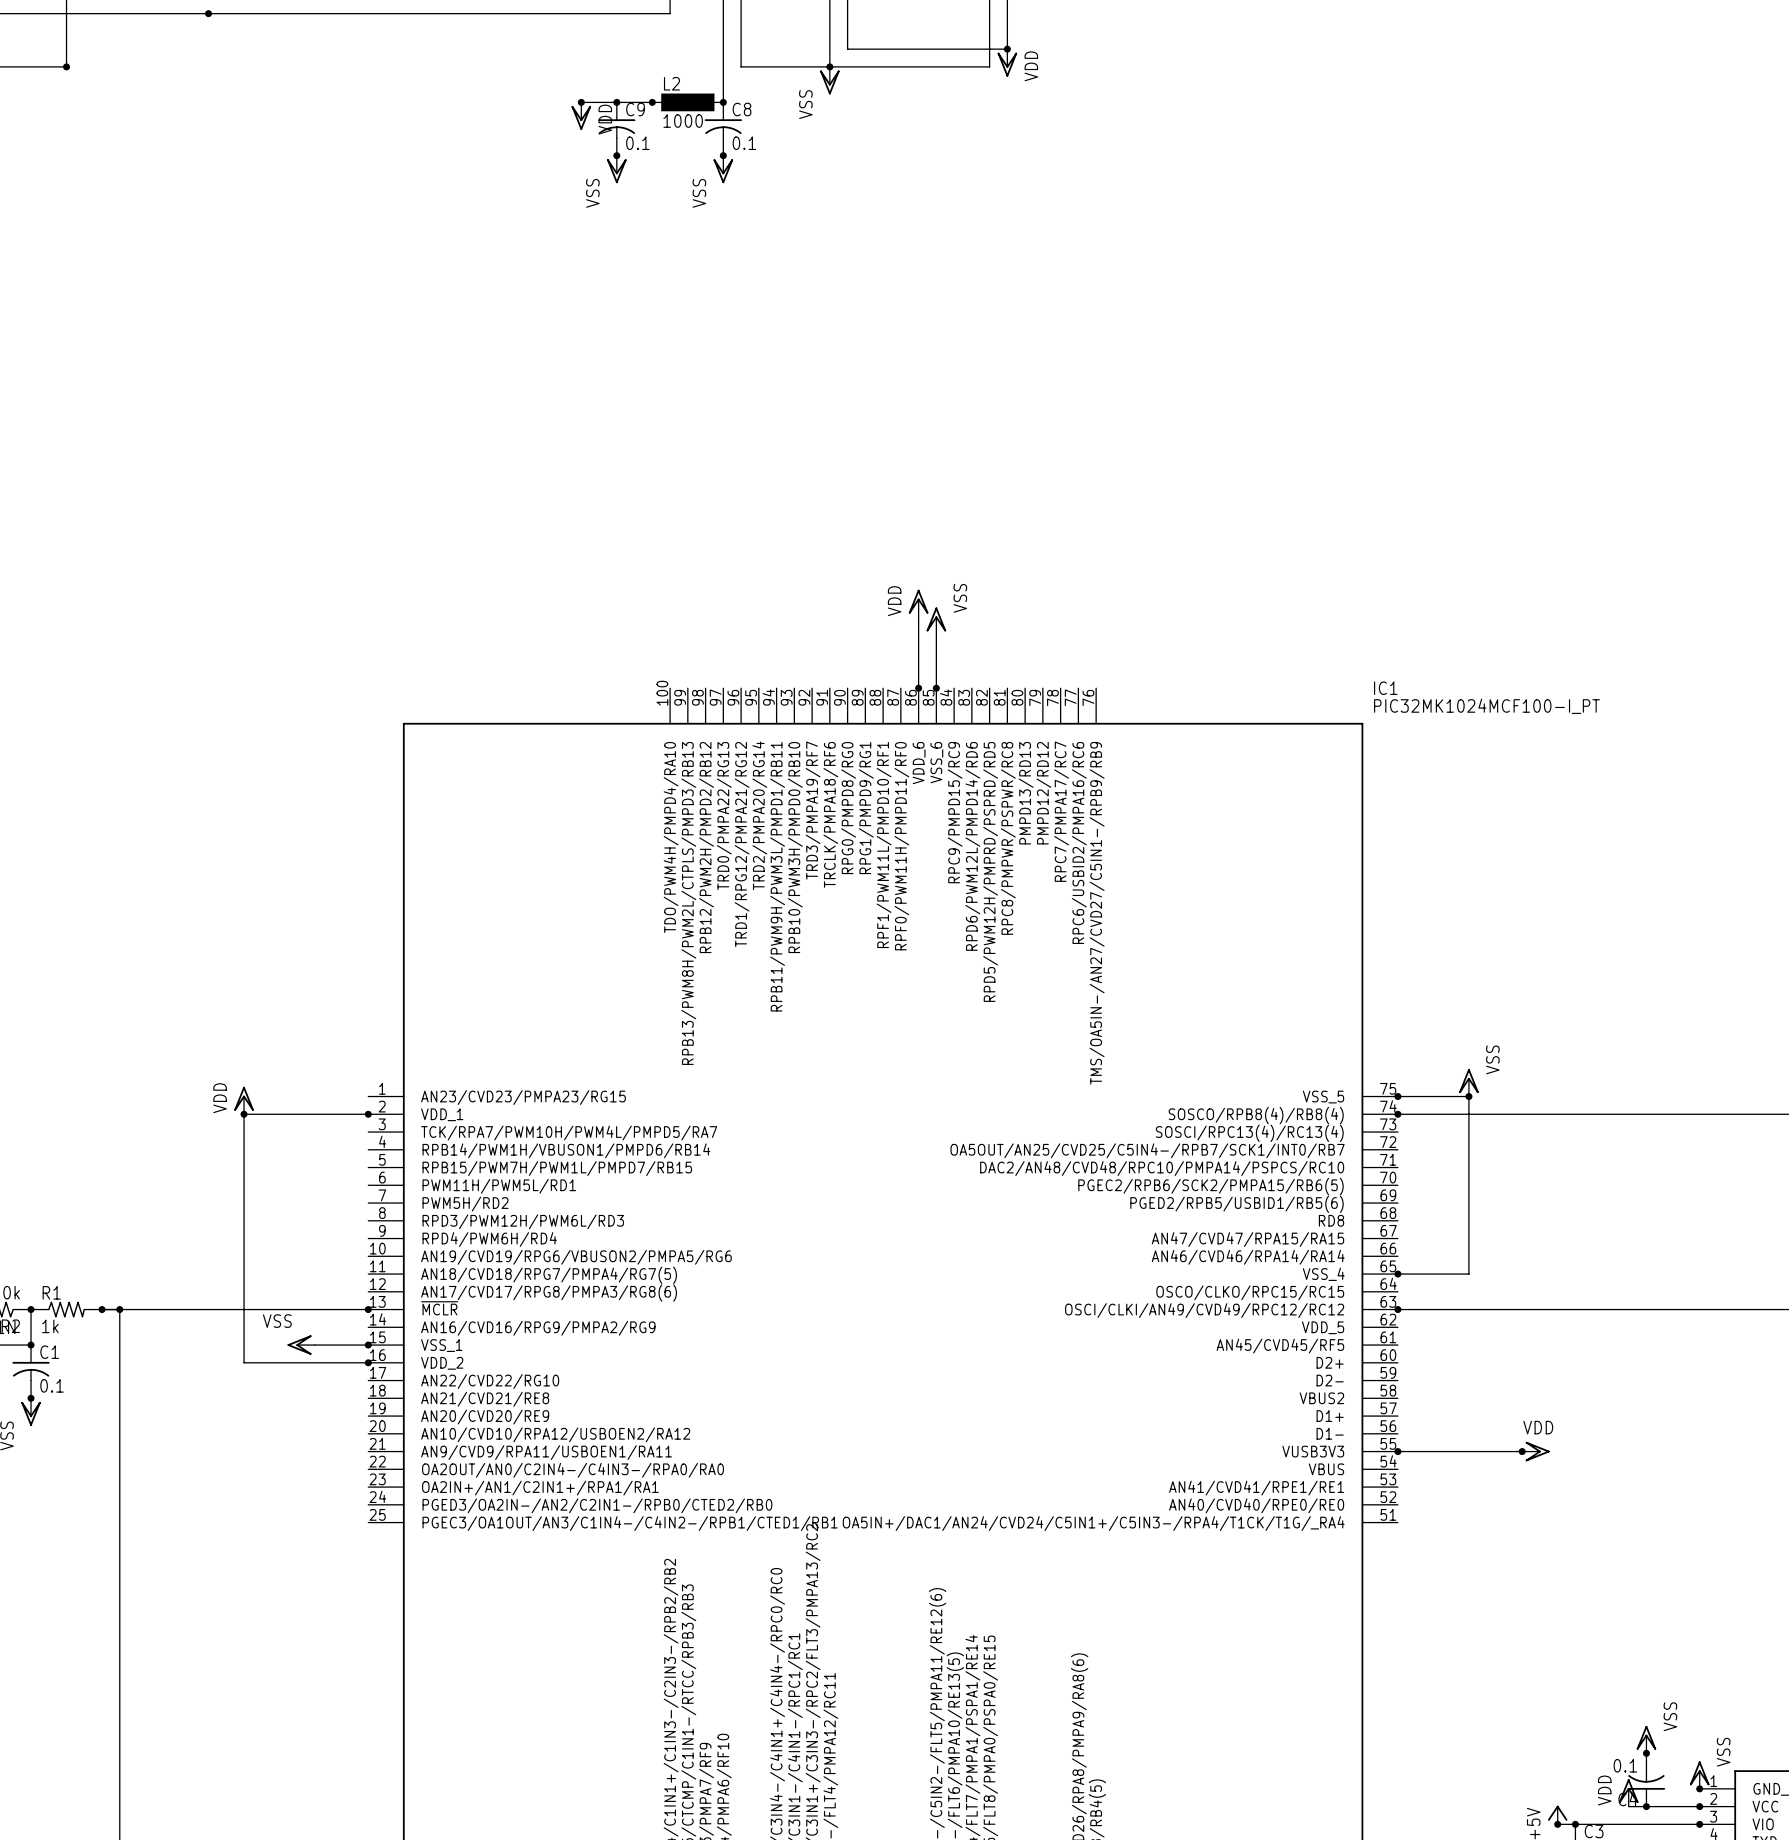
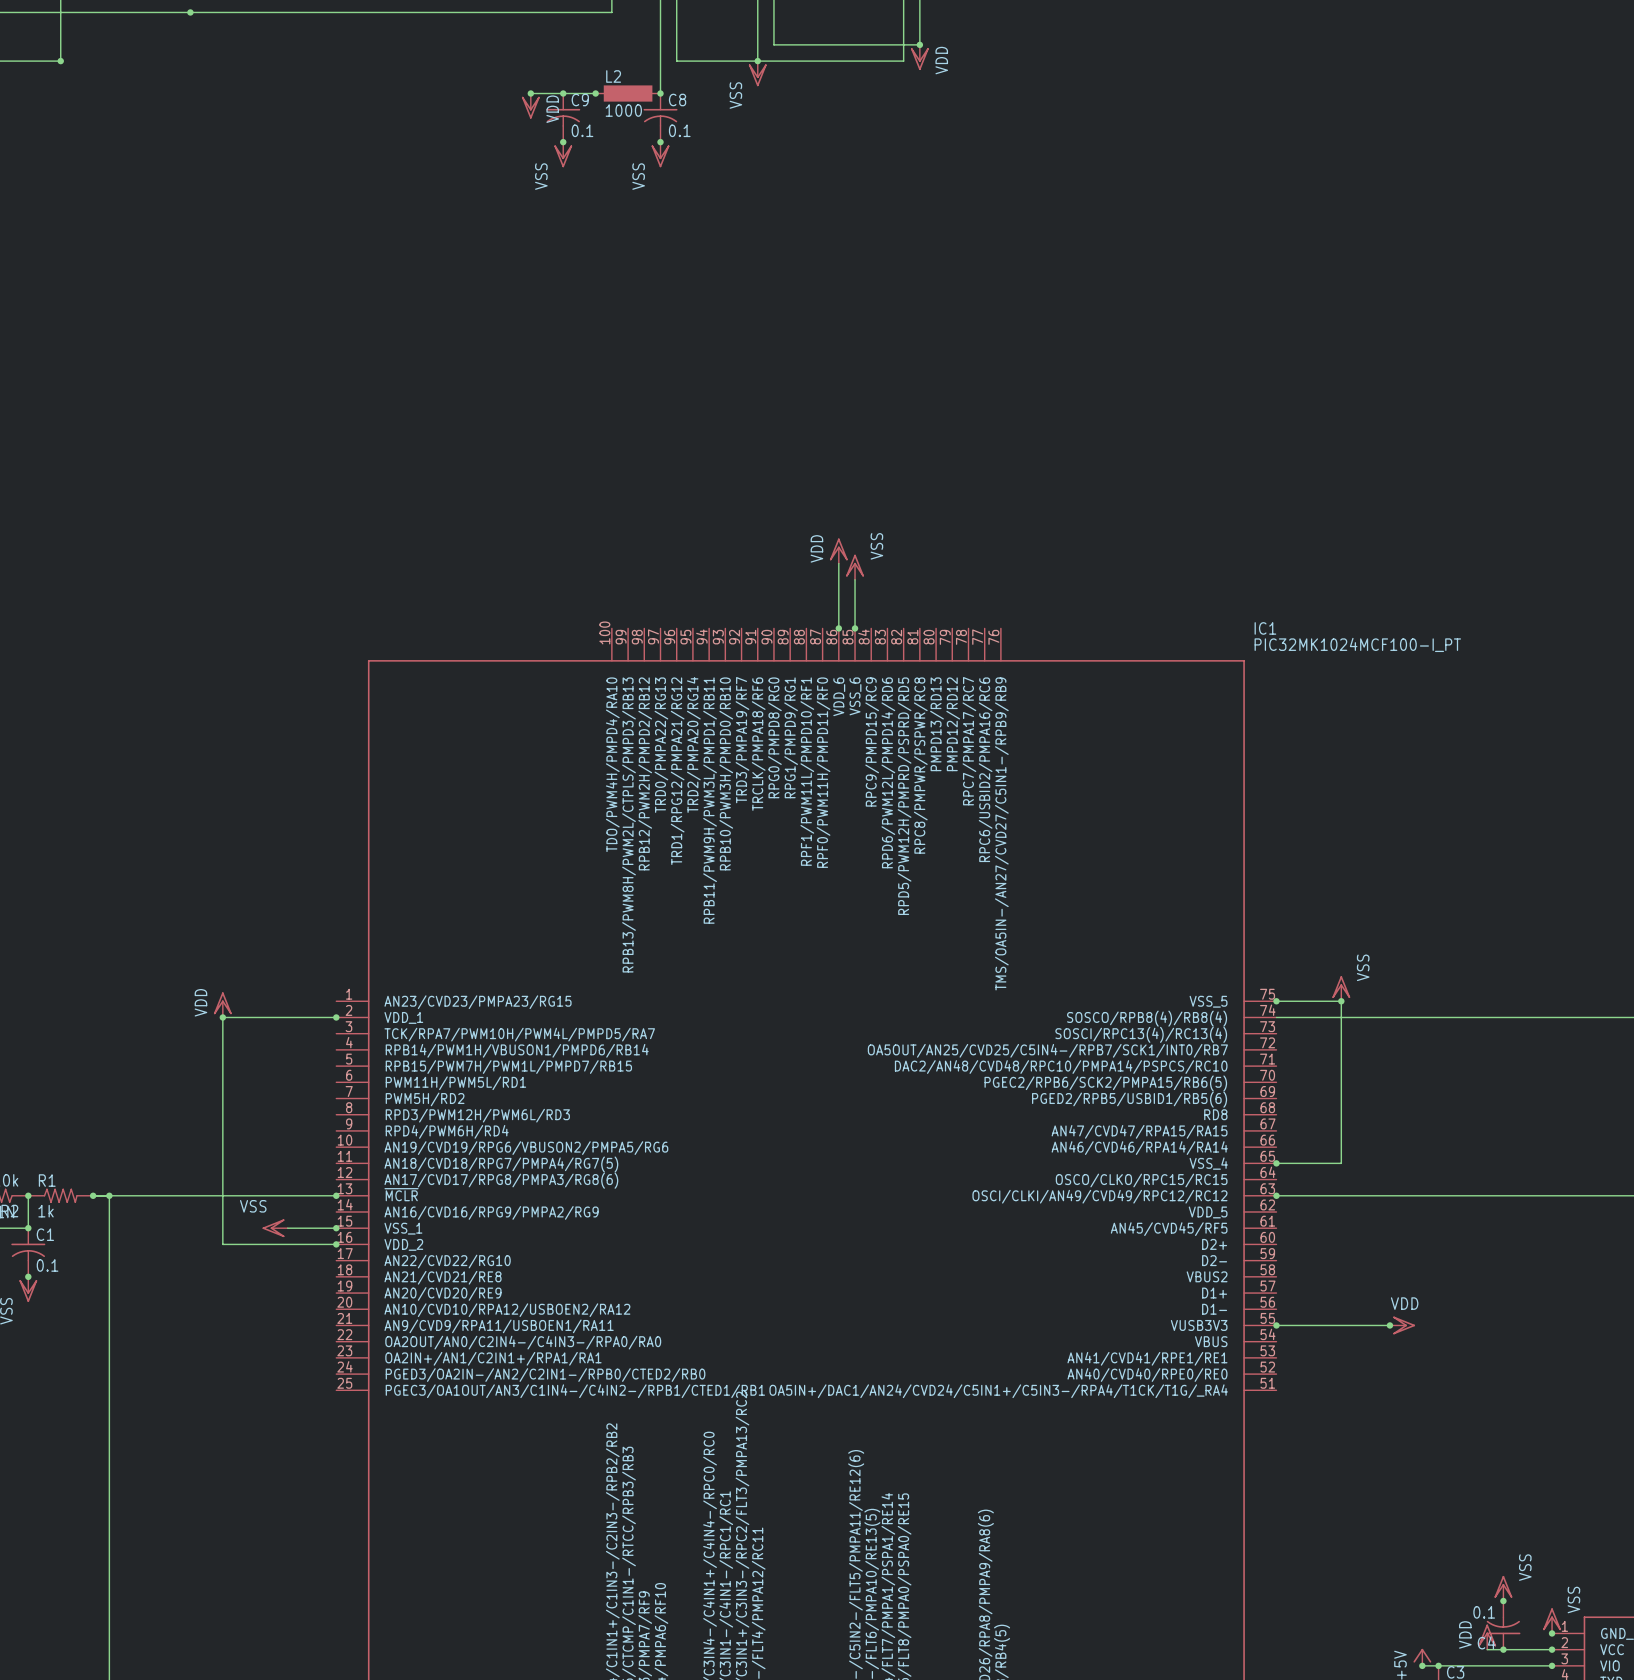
junction: (1397, 1114) -> none

